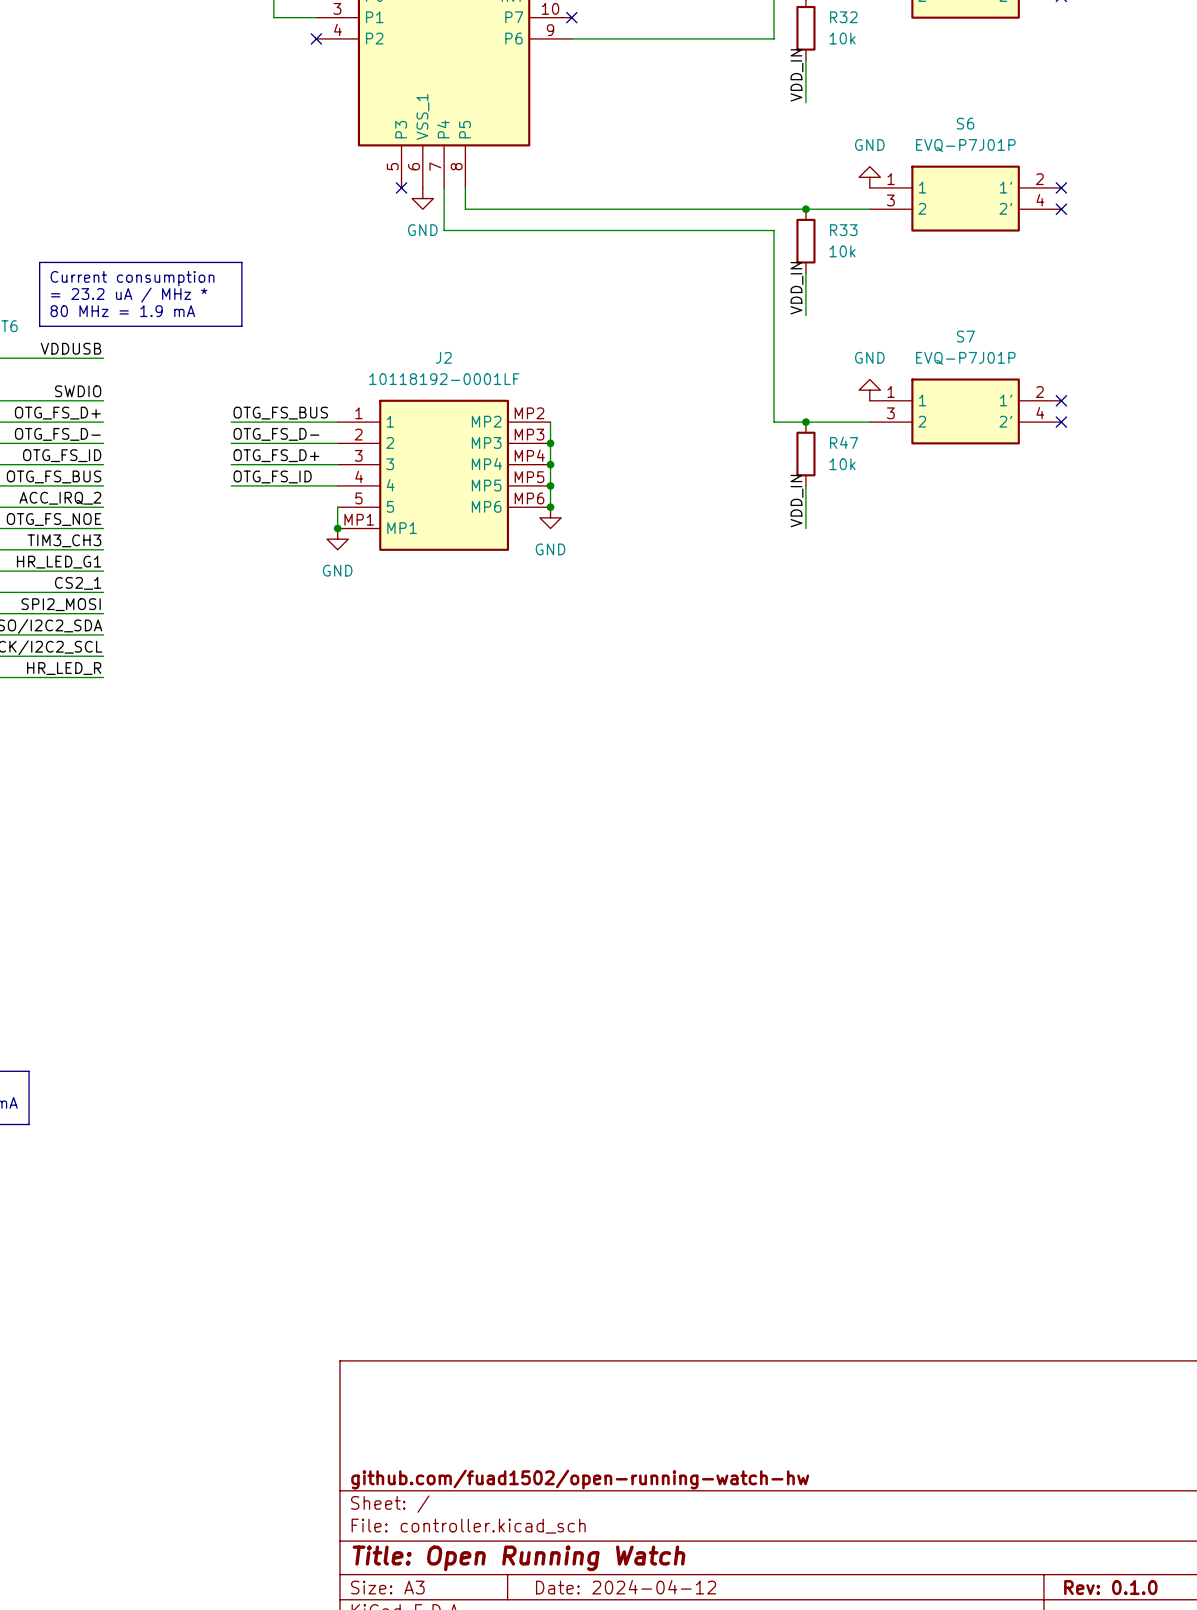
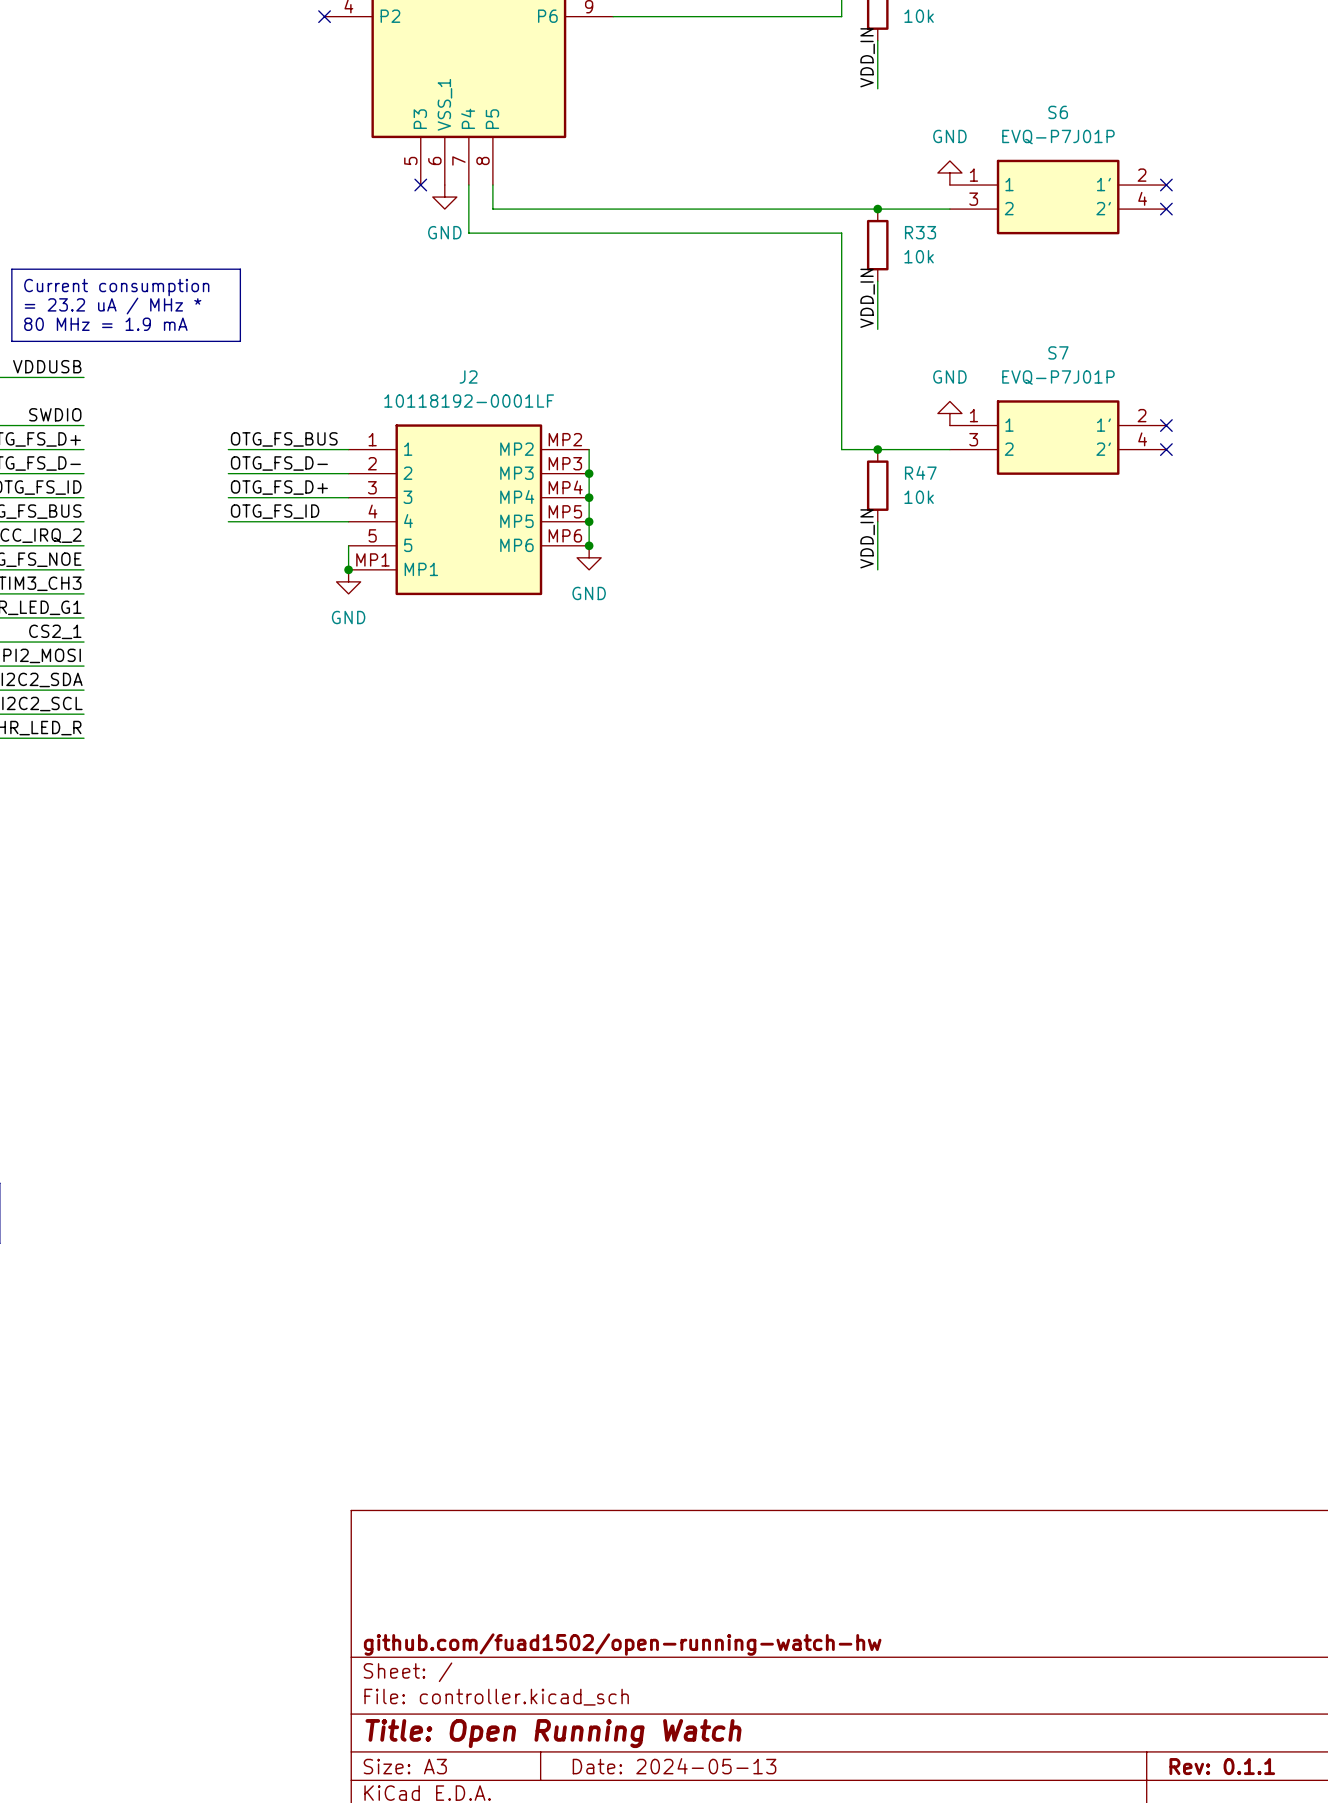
title block: Date: 2024-04-12 (626, 1587) -> Date: 2024-05-13 (674, 1766)
title block: Rev: 0.1.0 (1110, 1587) -> Rev: 0.1.1 (1222, 1766)

